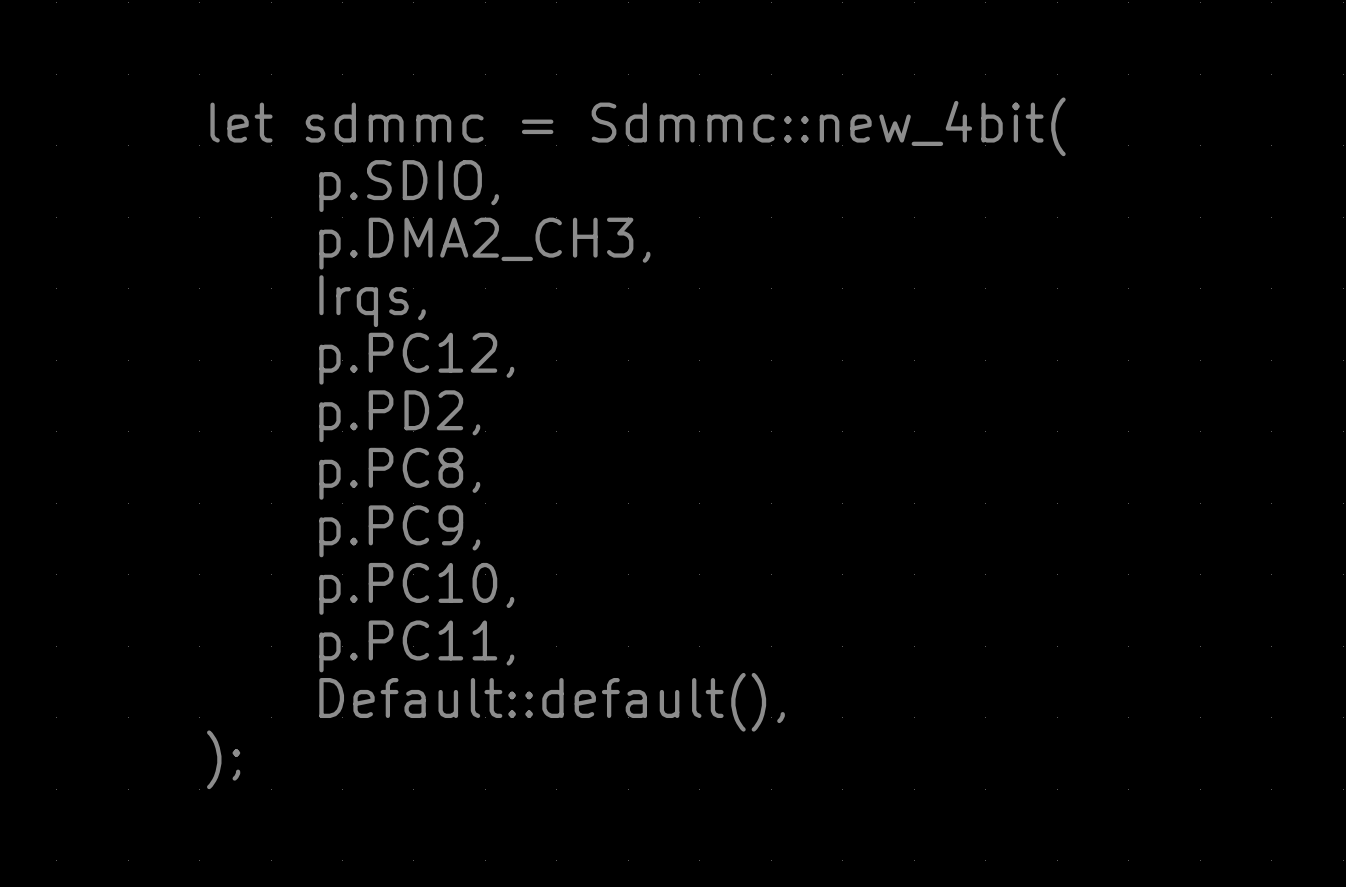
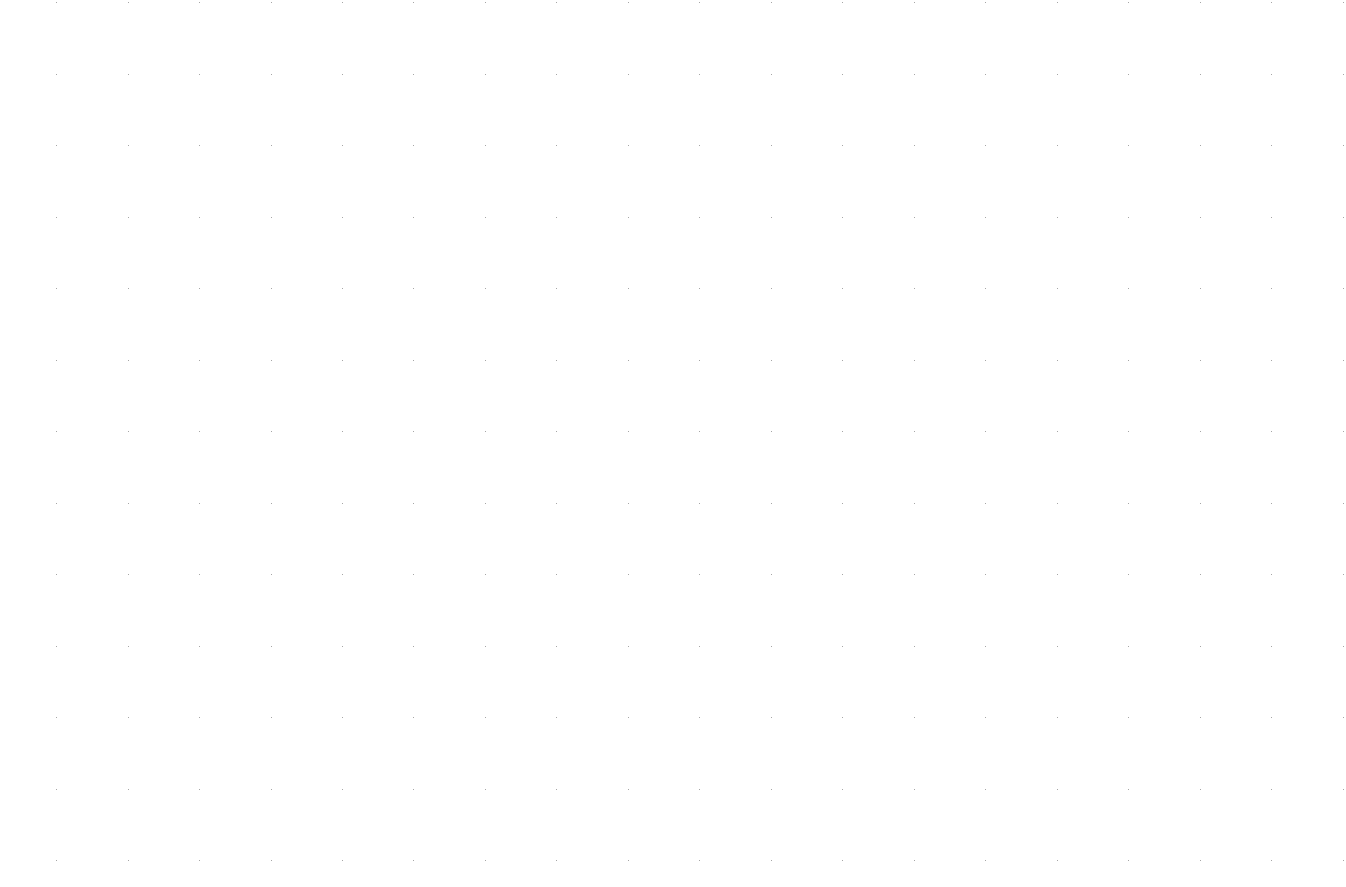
text: let sdmmc = Sdmmc::new_4bit( (638, 126) -> none
text: p.SDIO, (409, 186) -> none
text: p.DMA2_CH3, (484, 243) -> none
text: Irqs, (372, 301) -> none
text: p.PC12, (416, 358) -> none
text: p.PD2, (399, 416) -> none
text: p.PC8, (399, 473) -> none
text: p.PC9, (399, 531) -> none
text: p.PC10, (416, 588) -> none
text: p.PC11, (416, 646) -> none
text: Default::default(), (552, 702) -> none
text: ); (223, 759) -> none

